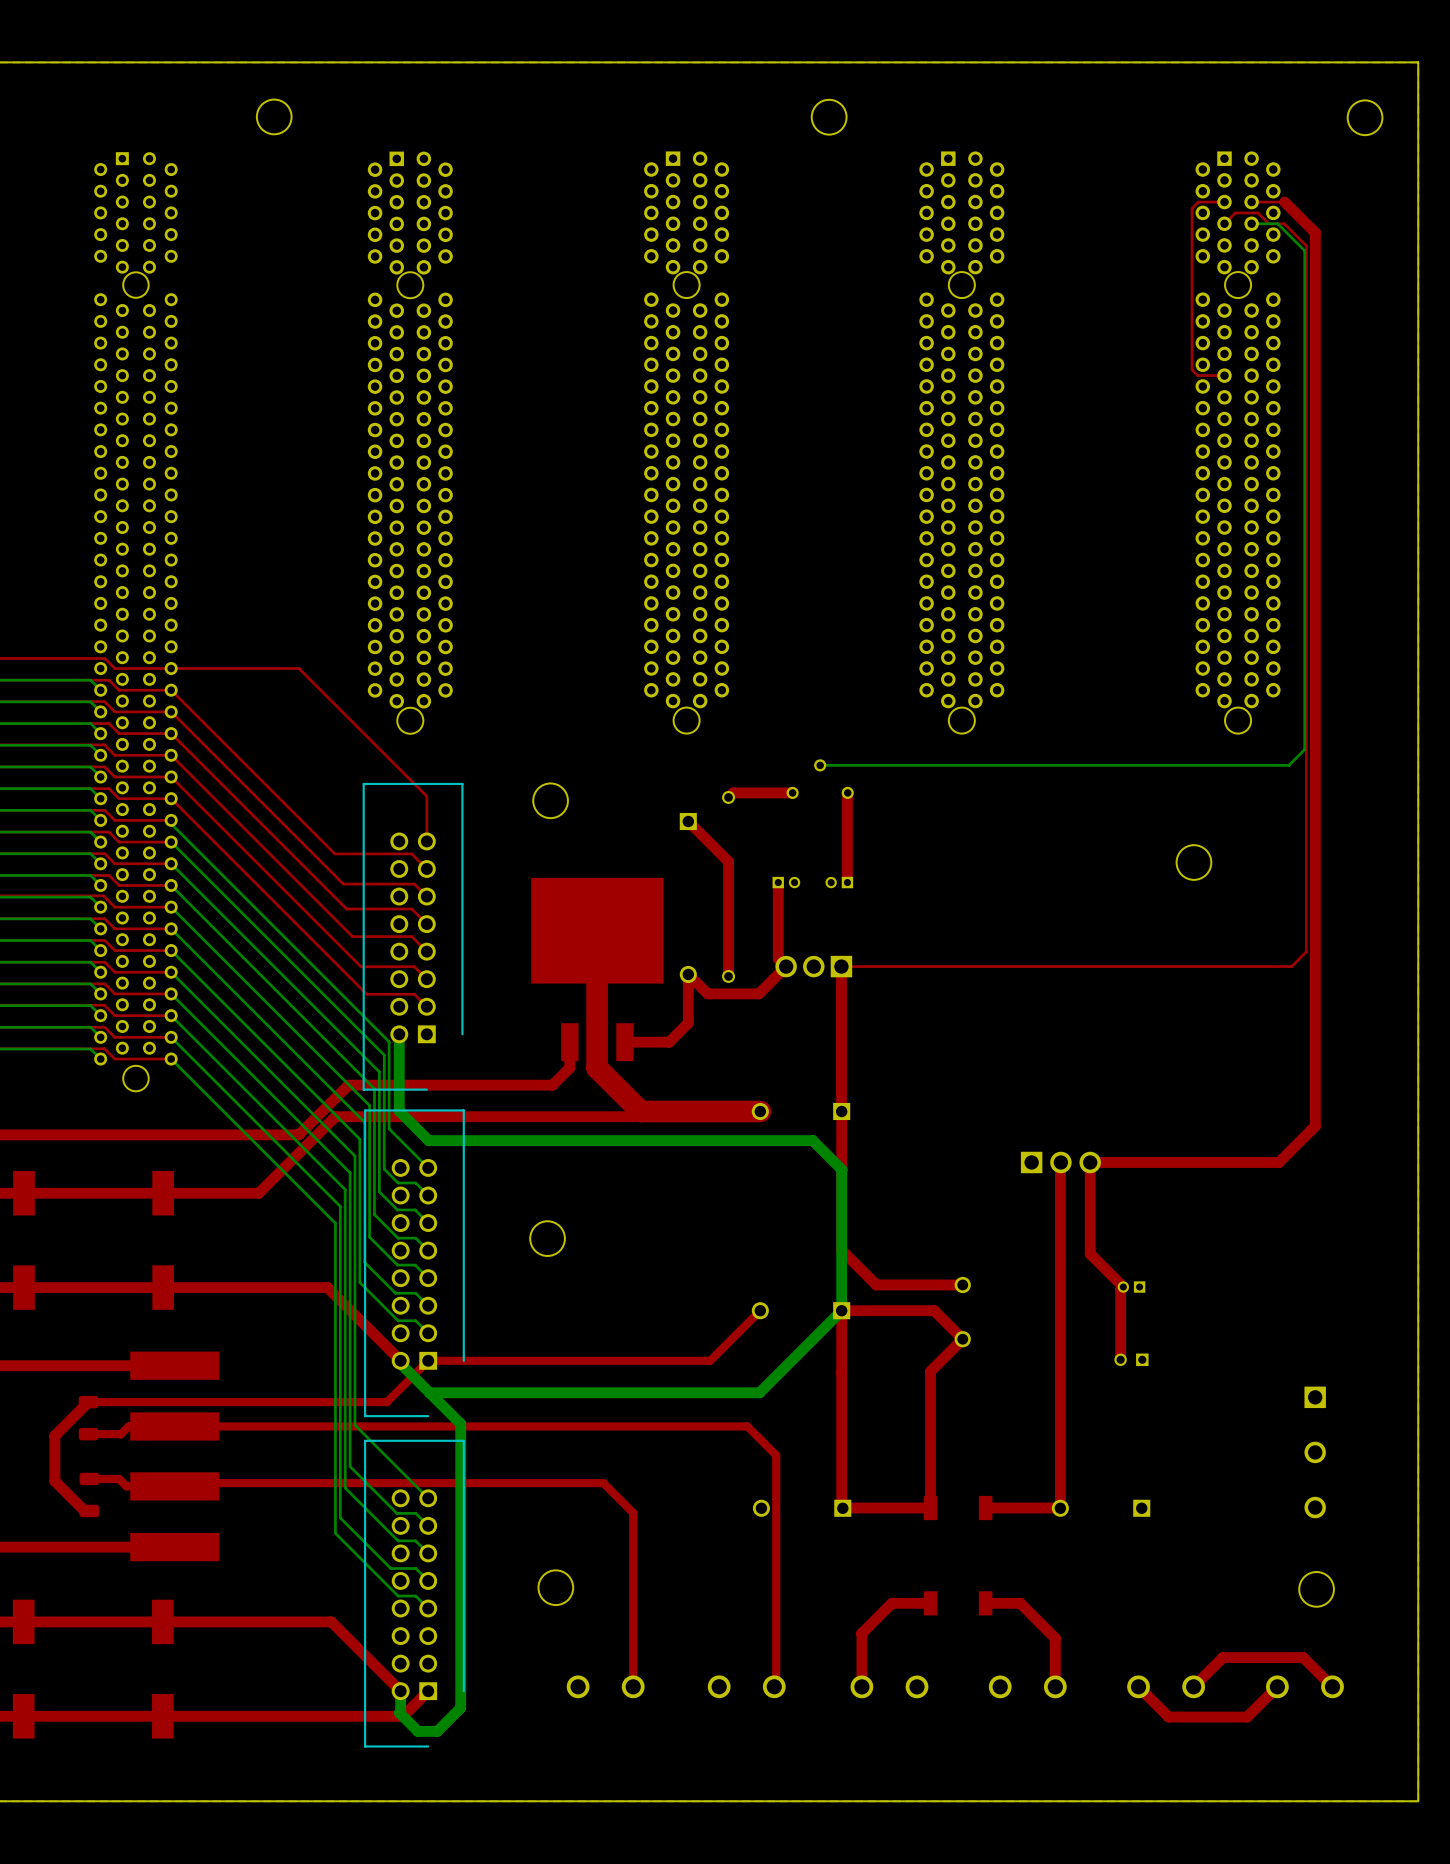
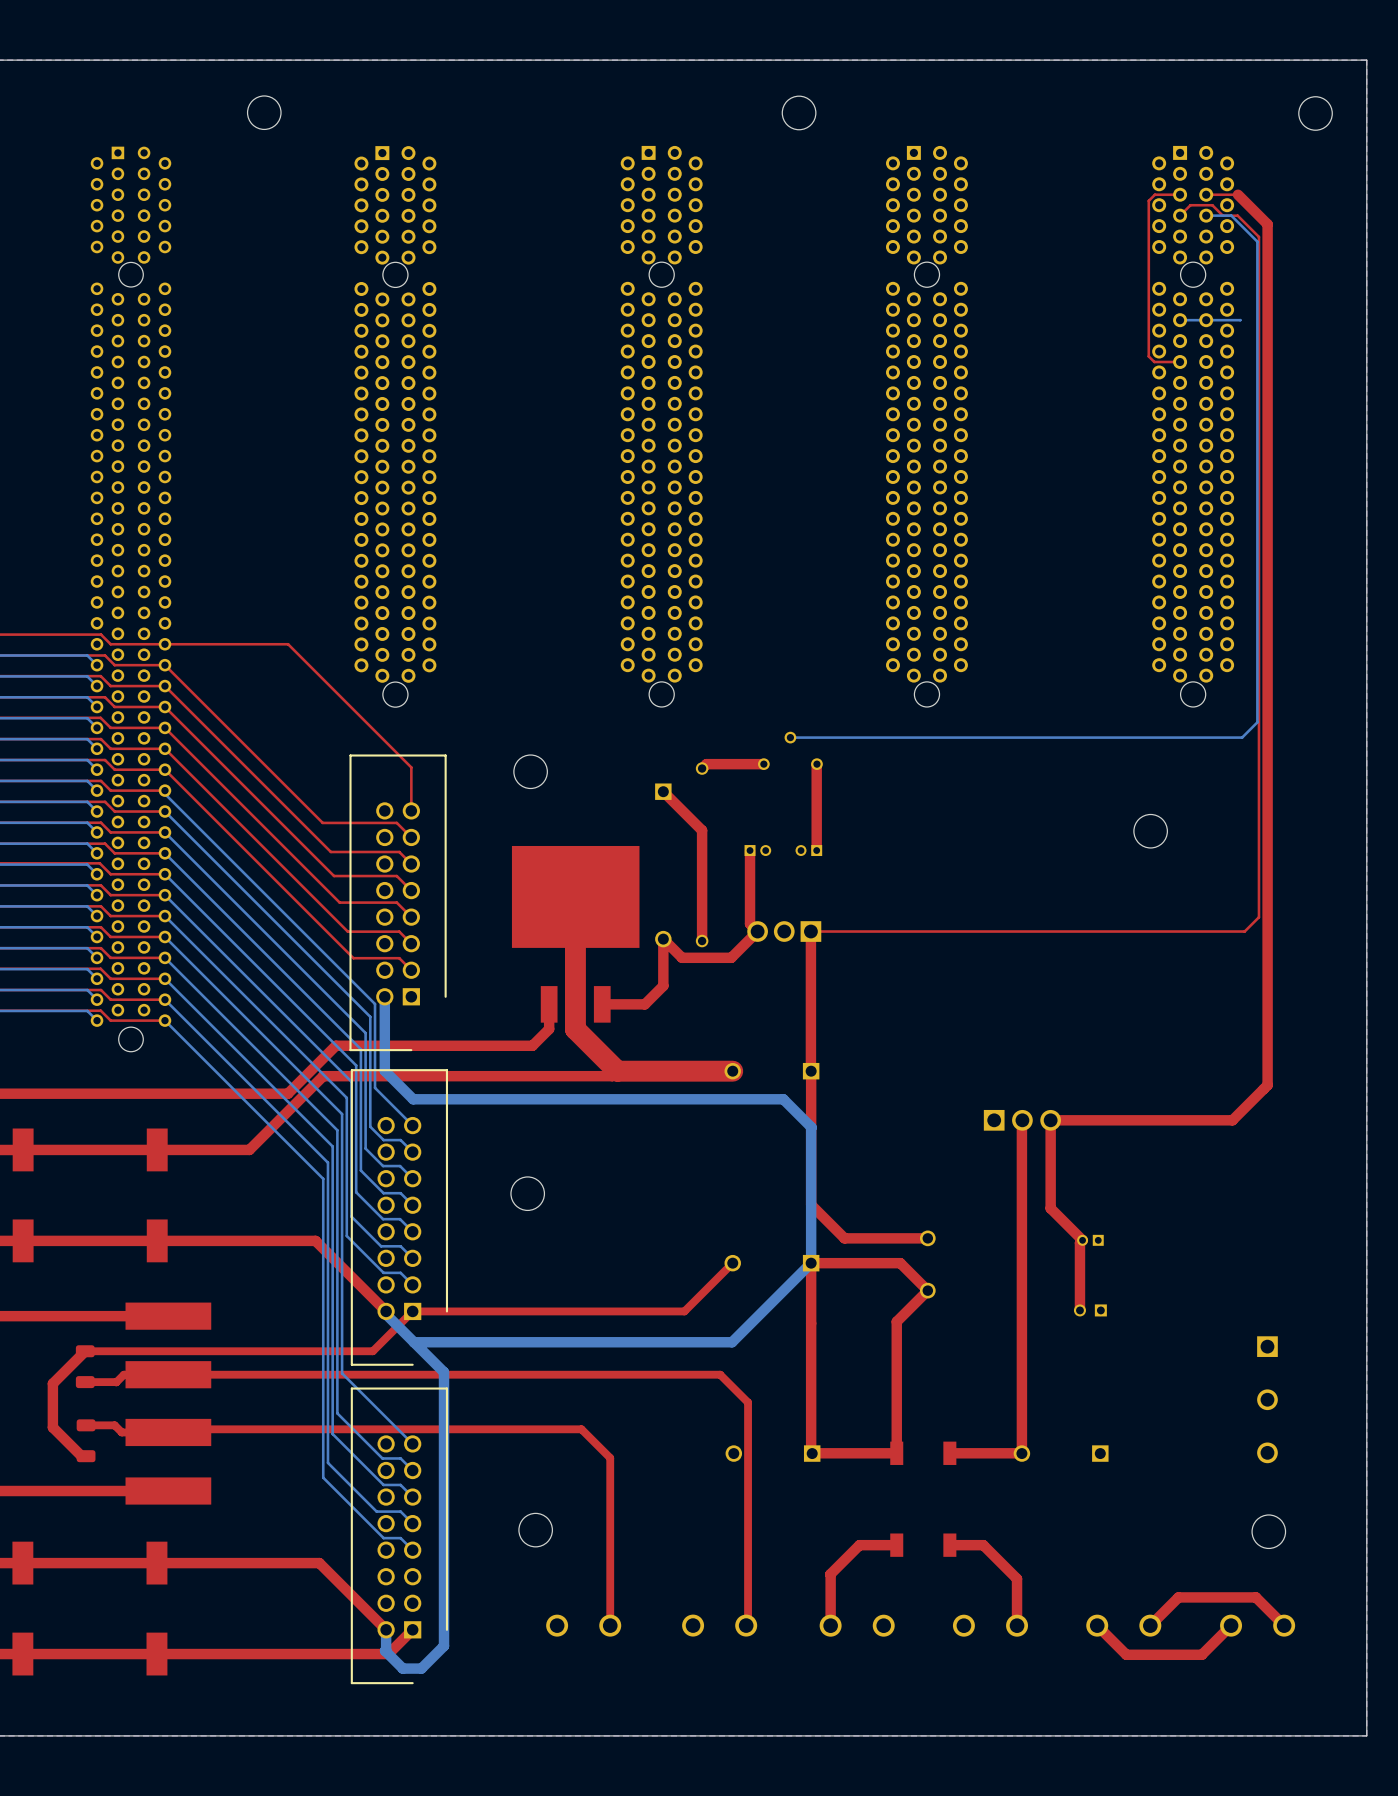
bottom track: none -> (1240, 320) (1180, 320)

